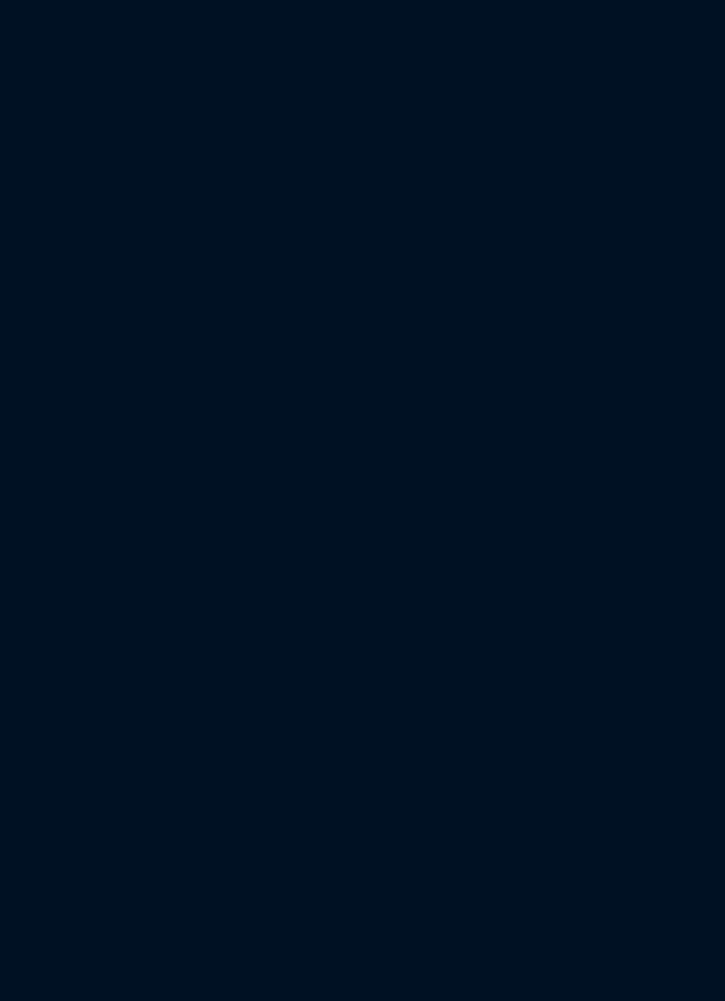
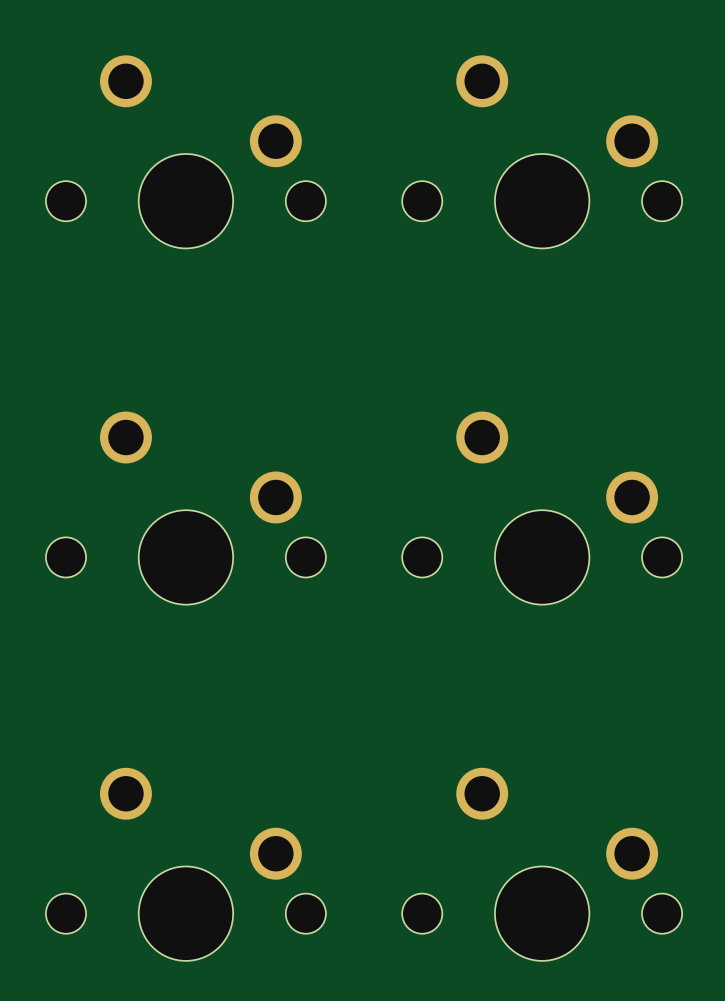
part: none -> (185, 151)
part: none -> (542, 151)
part: none -> (185, 508)
part: none -> (542, 508)
part: none -> (185, 864)
part: none -> (542, 864)

